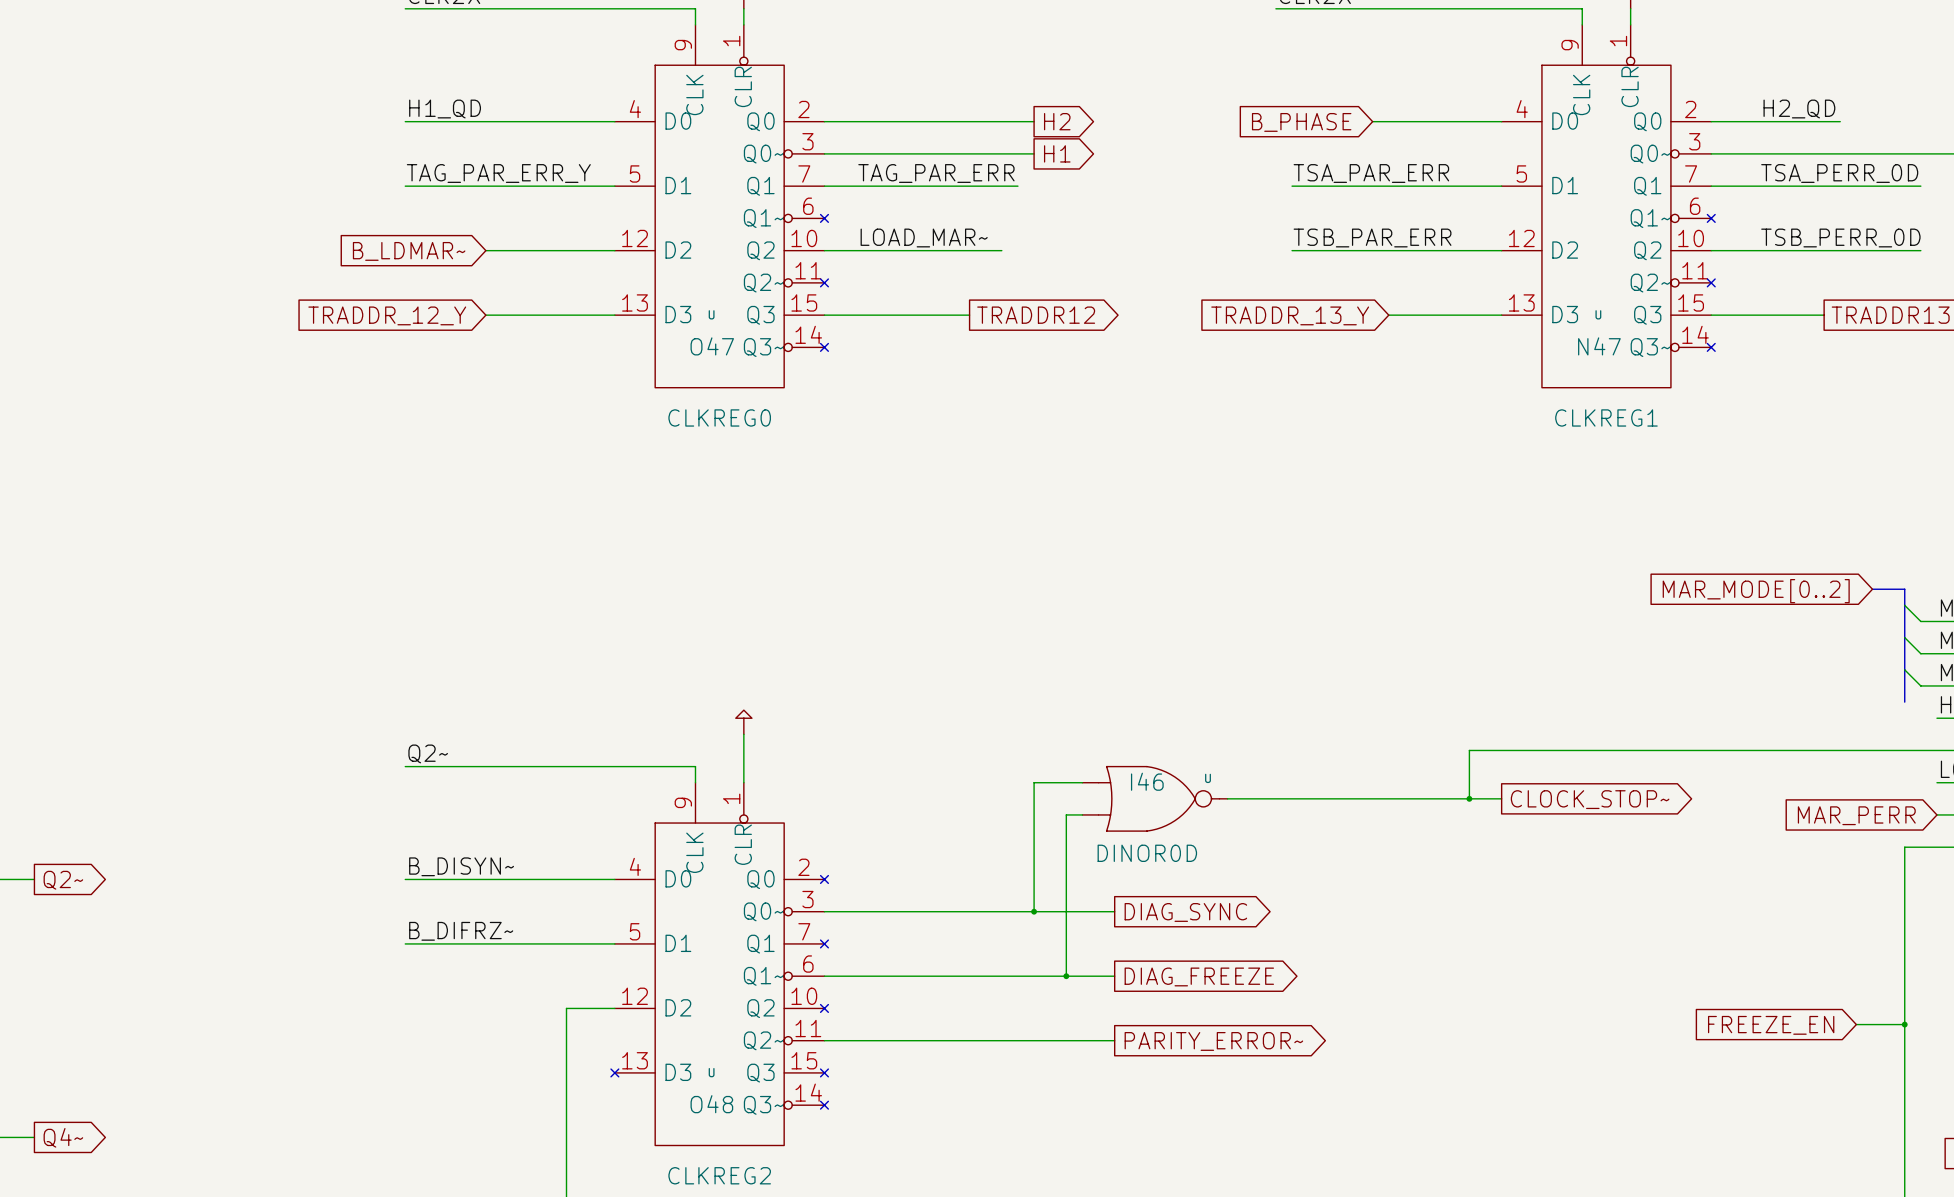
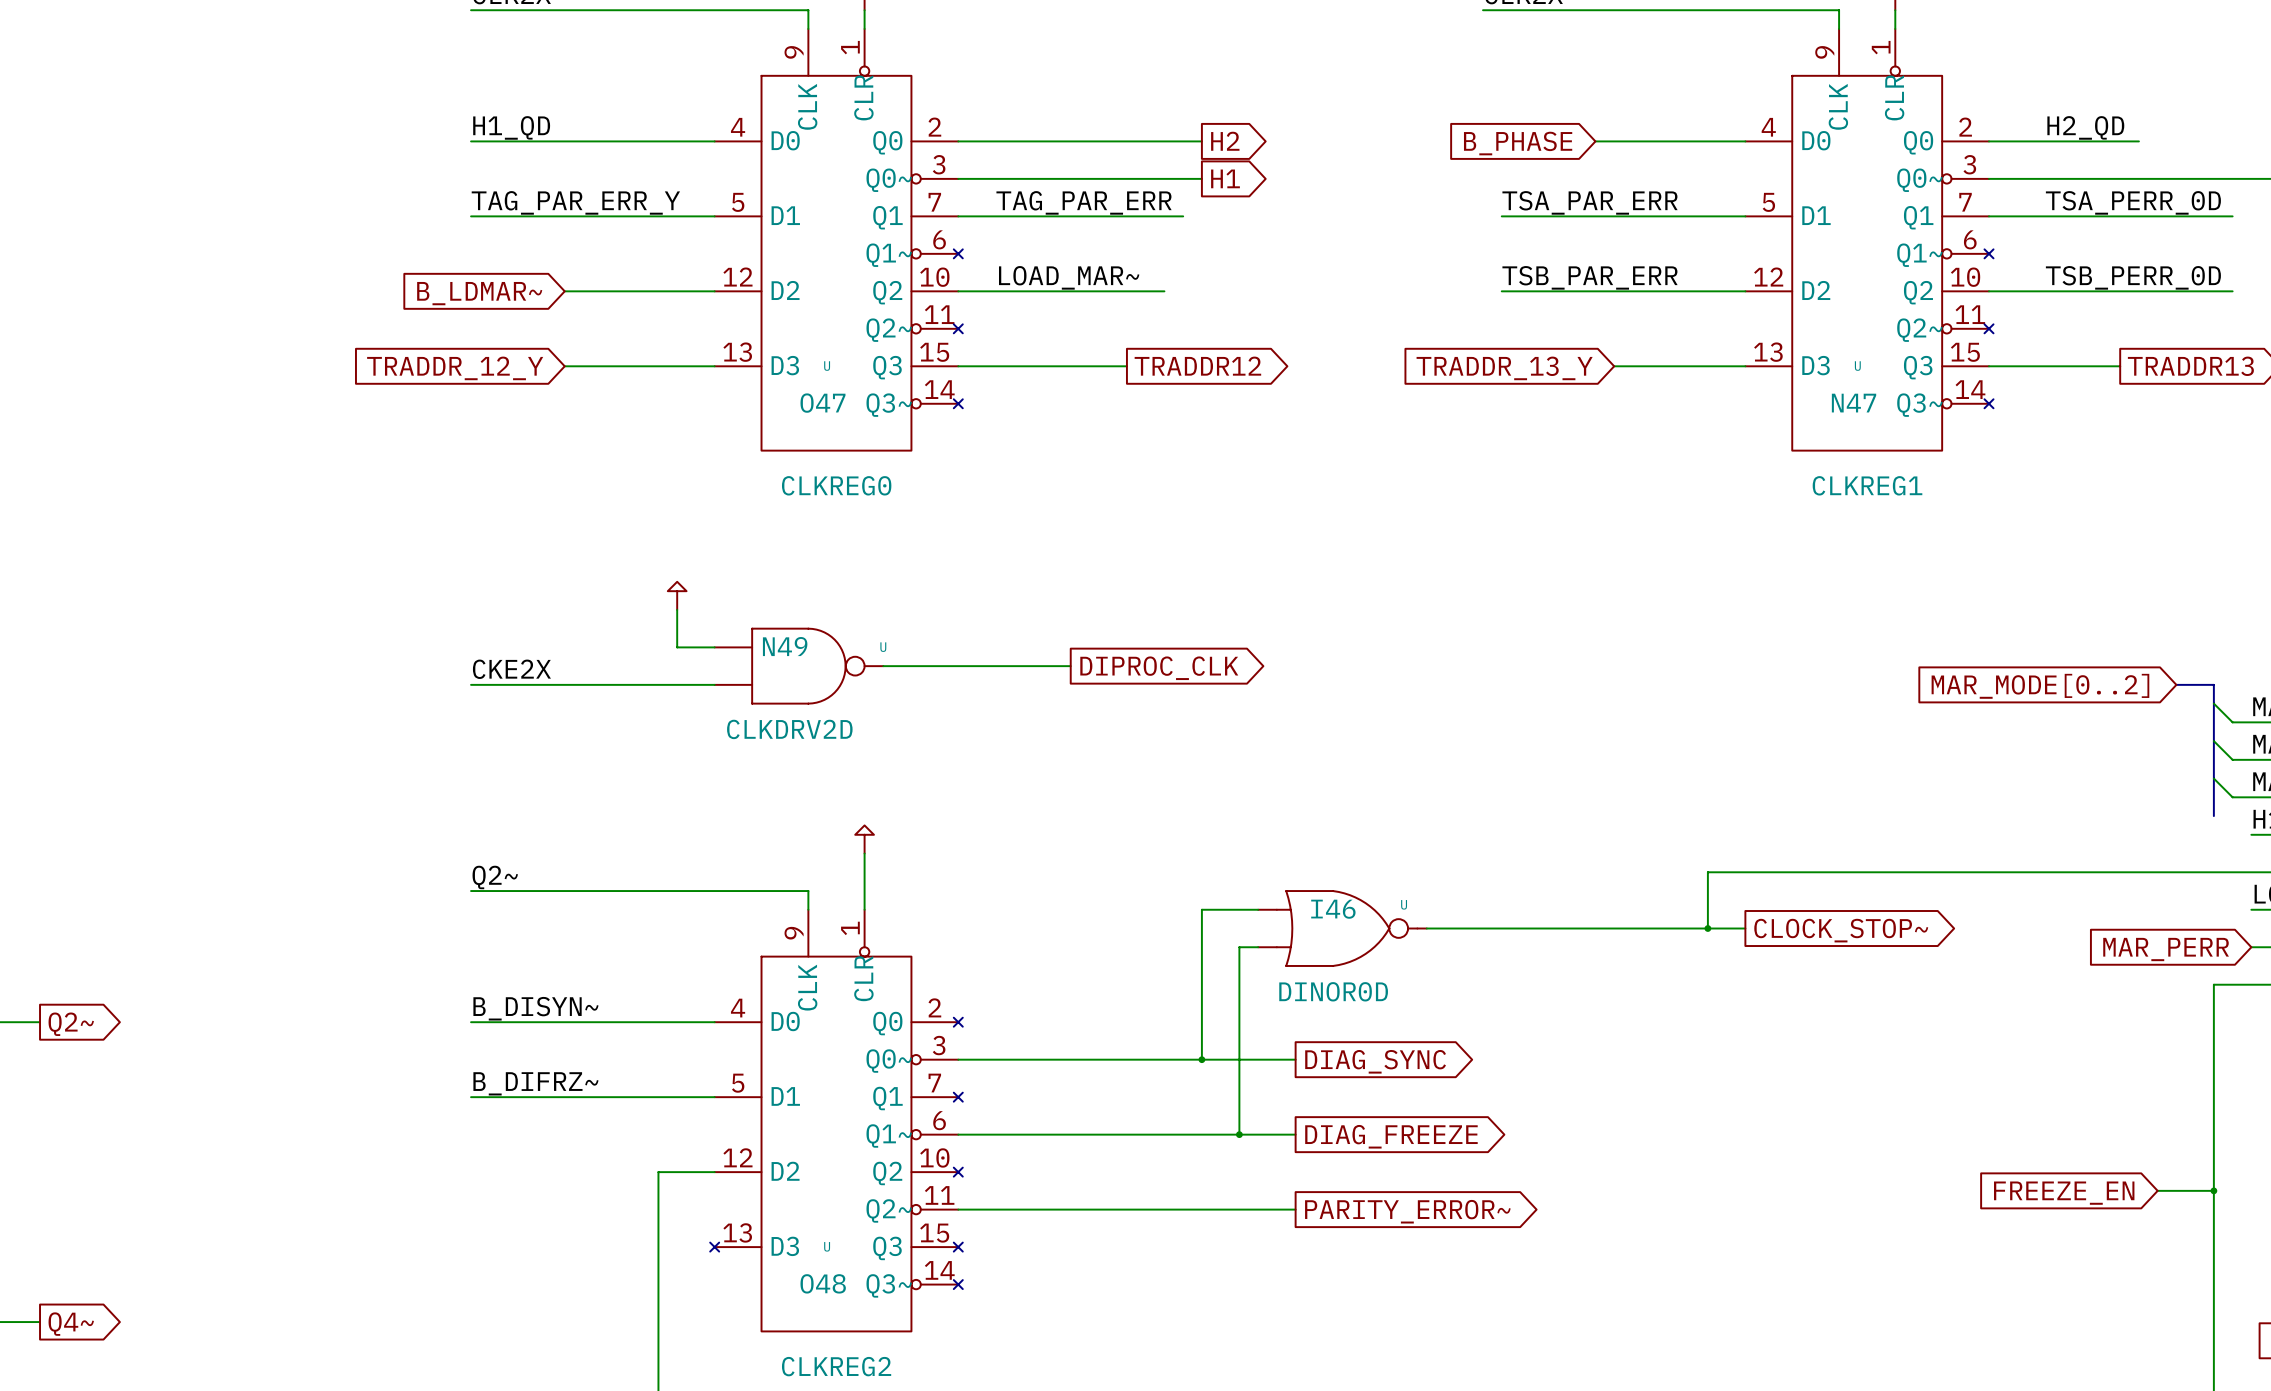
power symbol: none -> (677, 595)
wire: none -> (677, 609) (677, 647) (714, 647)
U: none -> (799, 666)
wire: none -> (883, 666) (1070, 666)
global label: none -> DIPROC_CLK (1159, 668)
label: none -> CKE2X (511, 669)
wire: none -> (471, 684) (714, 684)

